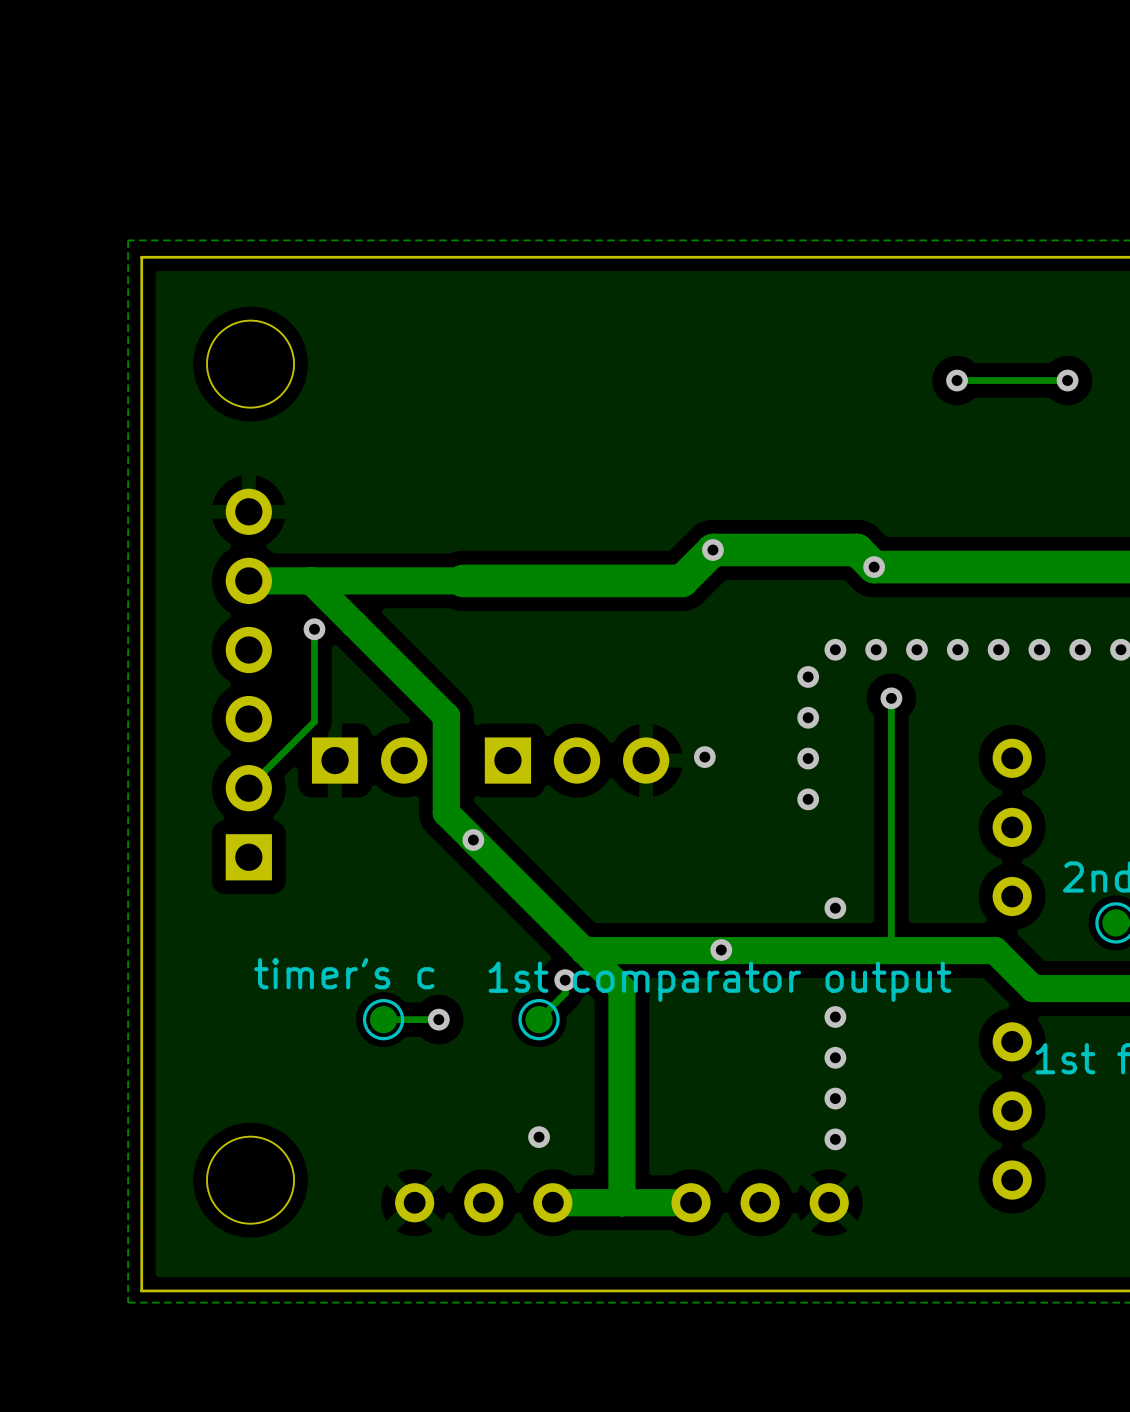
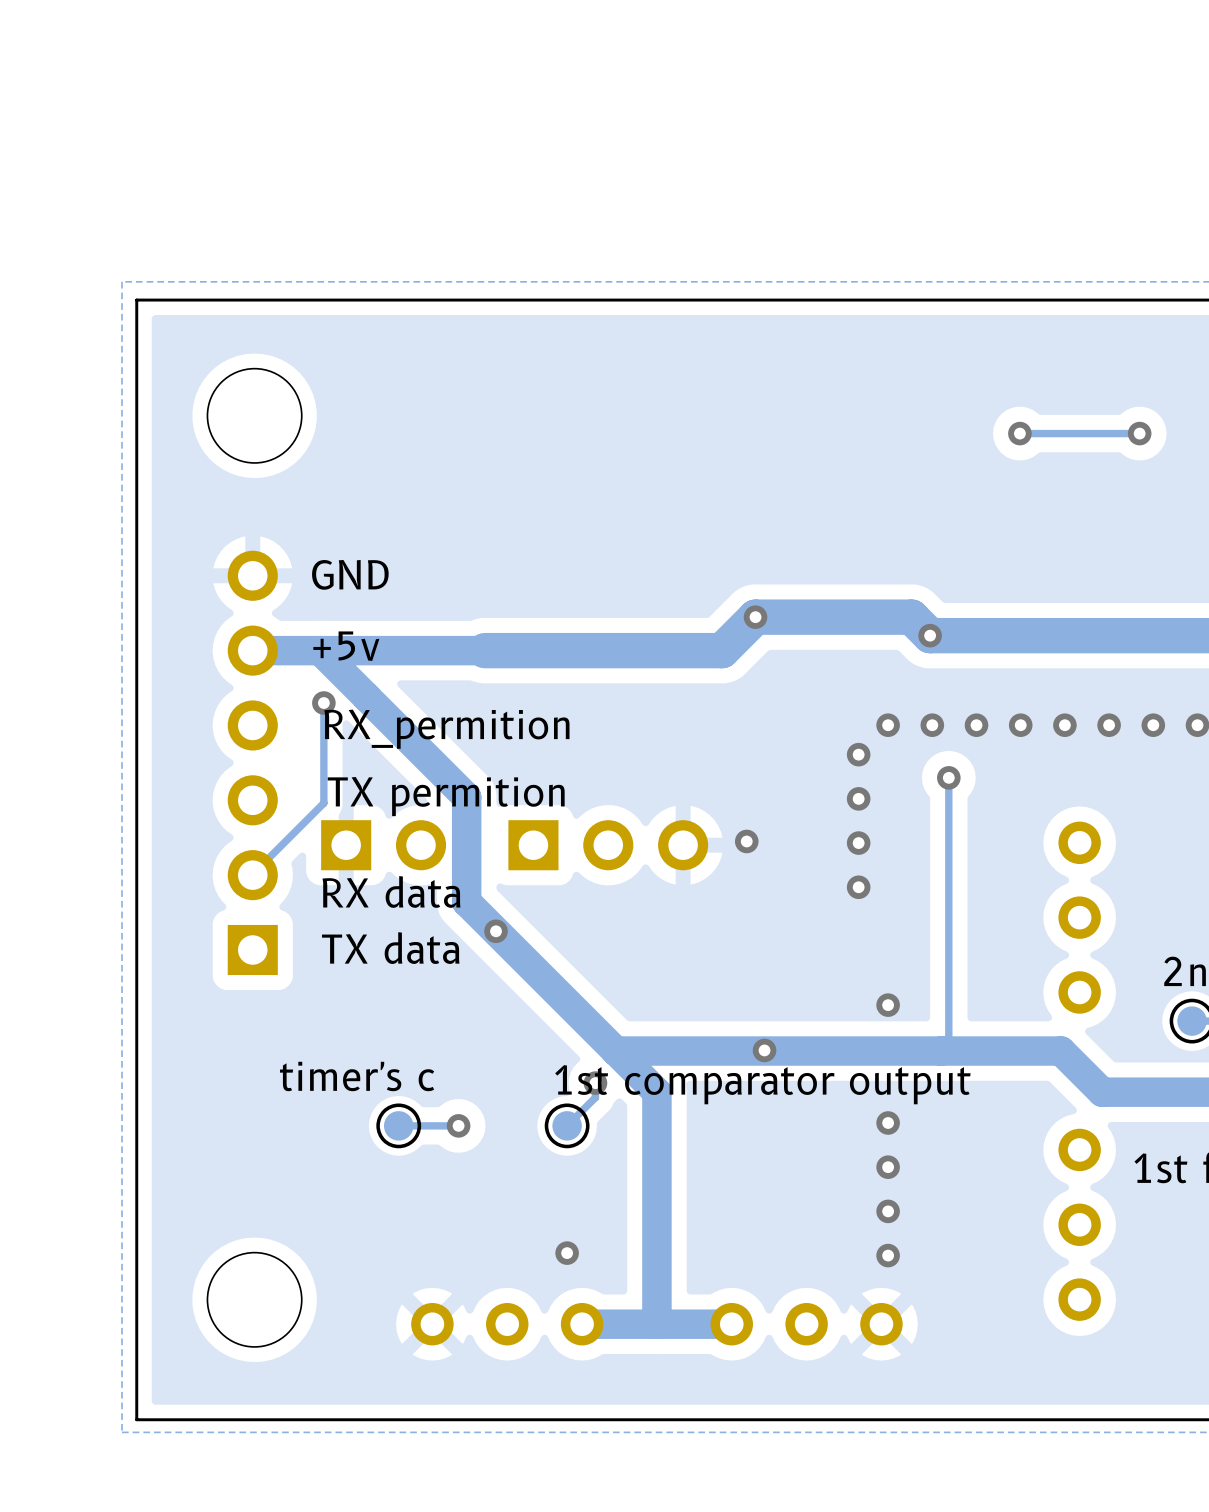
text: none -> GND (350, 574)
text: none -> +5v (346, 646)
text: none -> RX_permition (446, 729)
text: none -> TX permition (446, 796)
text: none -> RX data (391, 891)
text: none -> TX data (390, 948)

